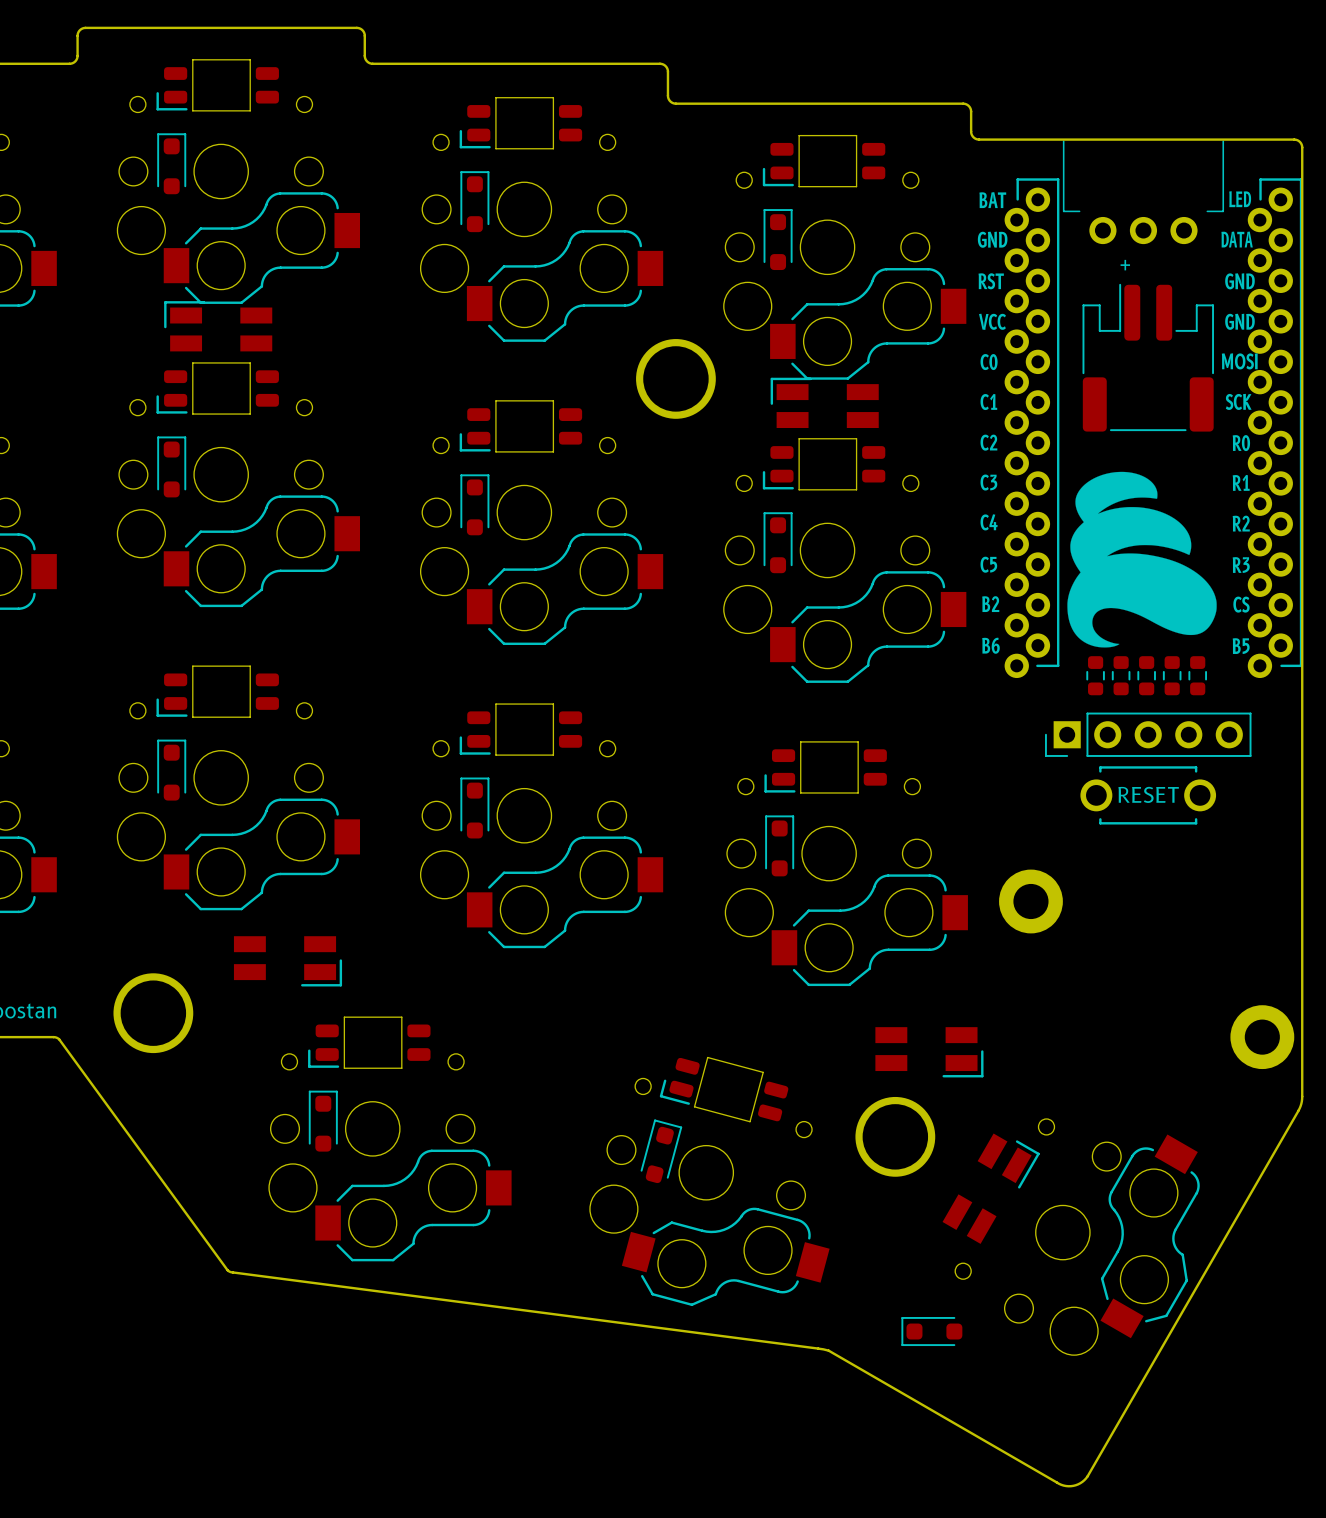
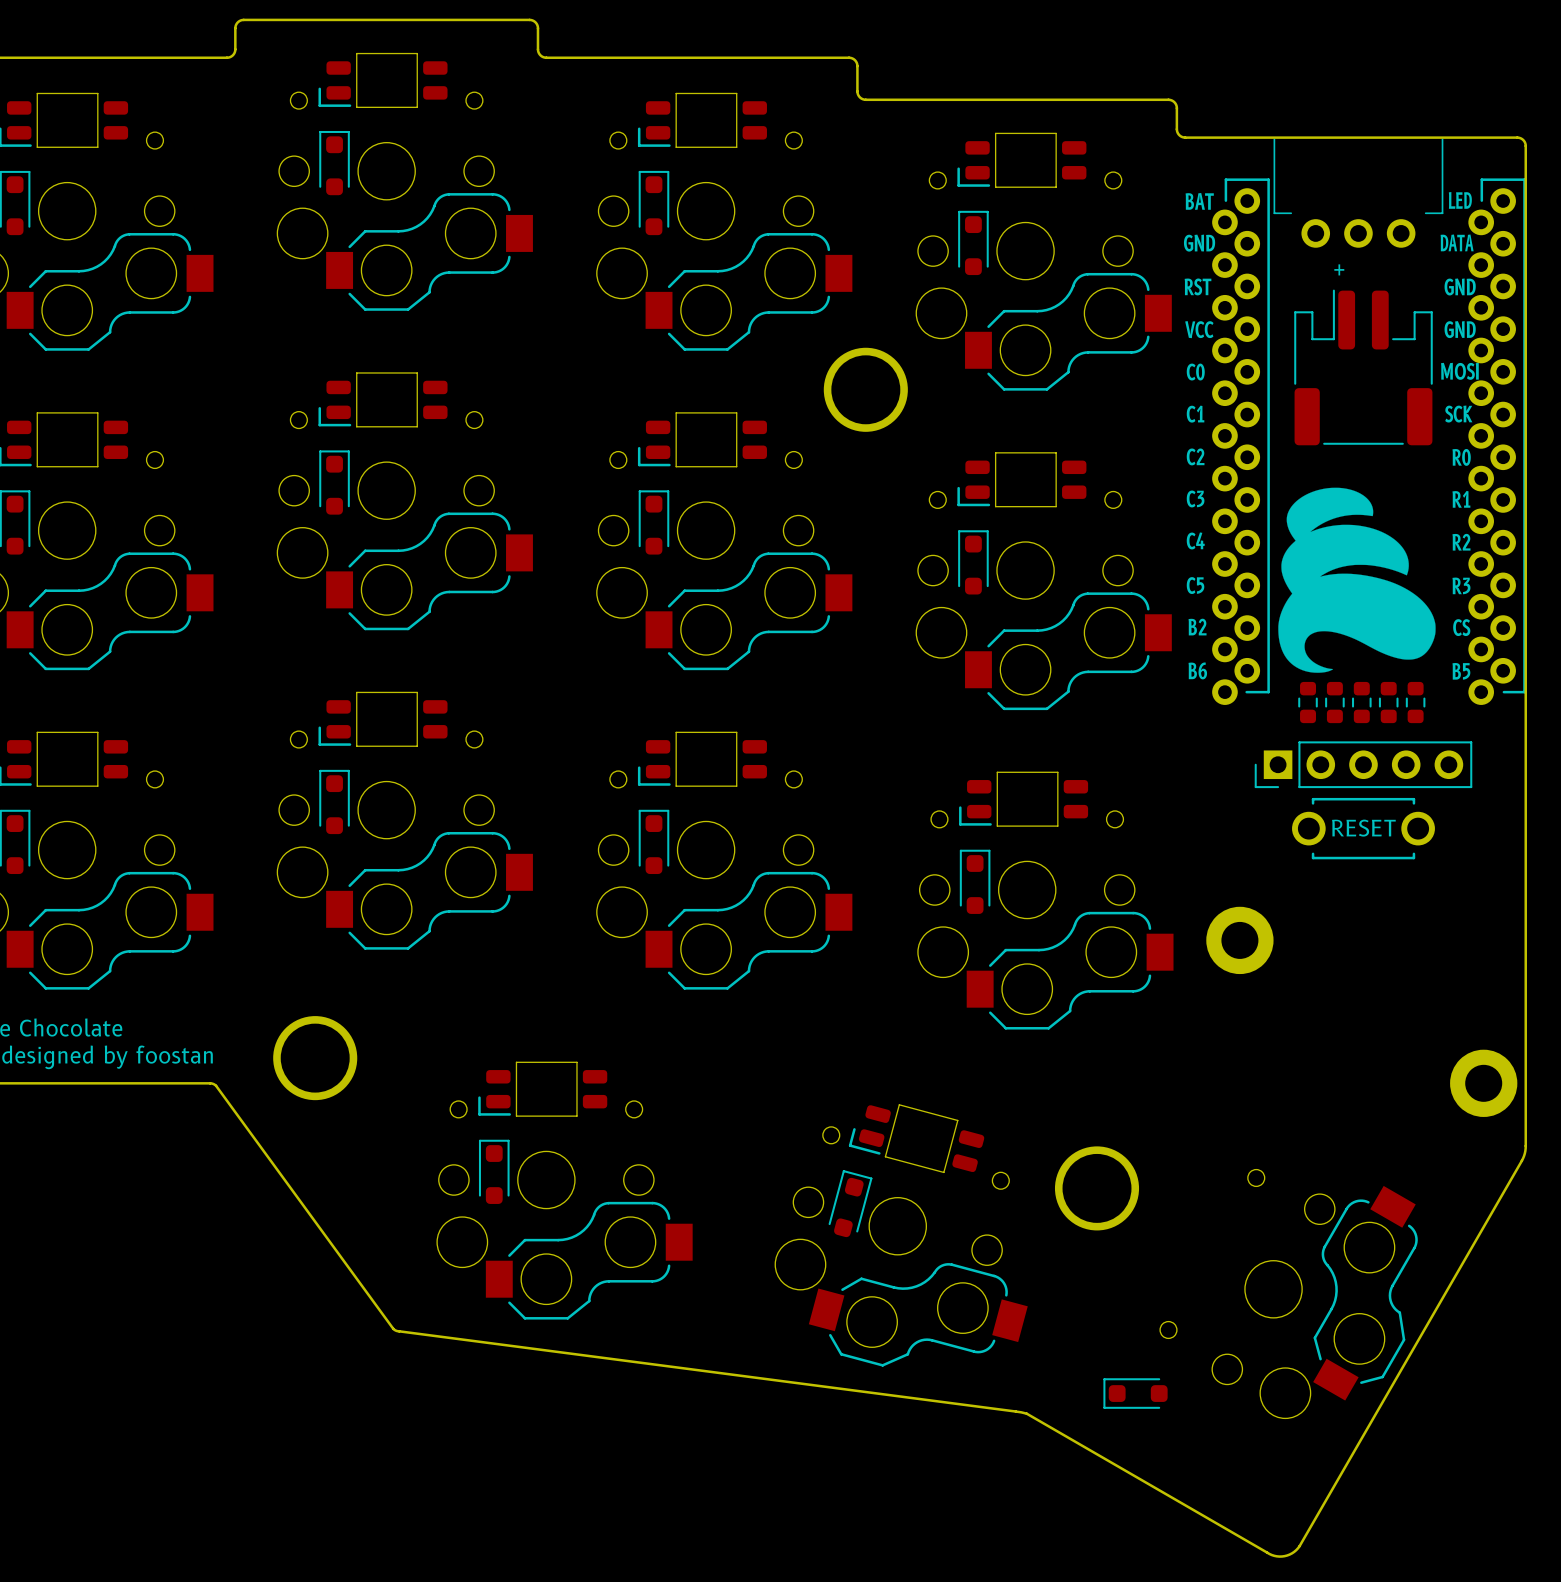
part: (218, 326) -> none
part: (824, 402) -> none
part: (288, 961) -> none
part: (929, 1052) -> none
part: (991, 1188) -> none

